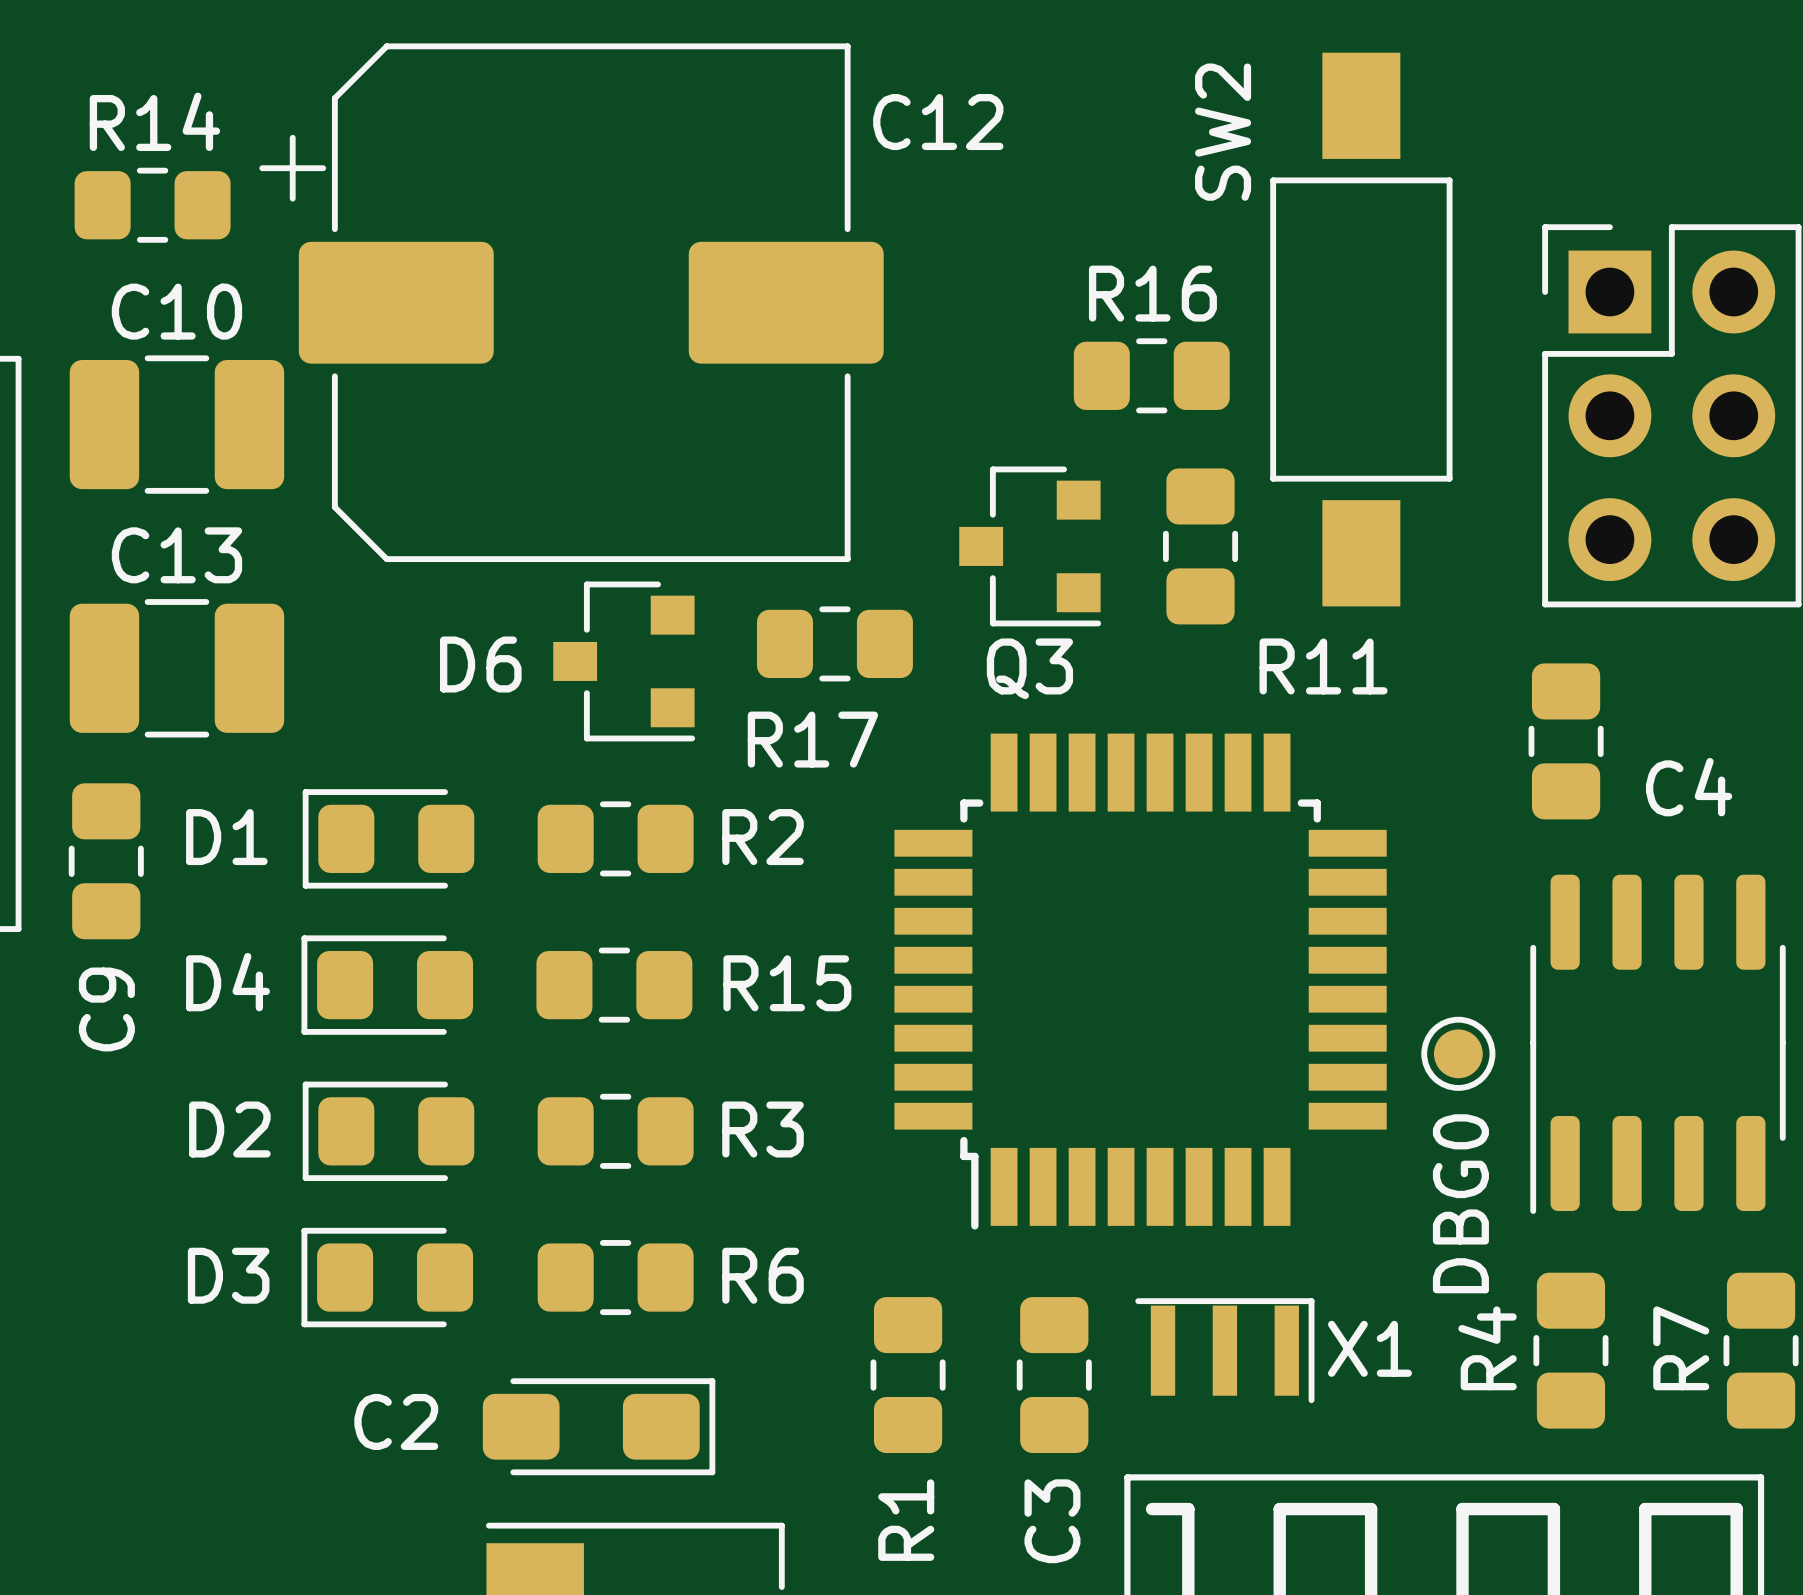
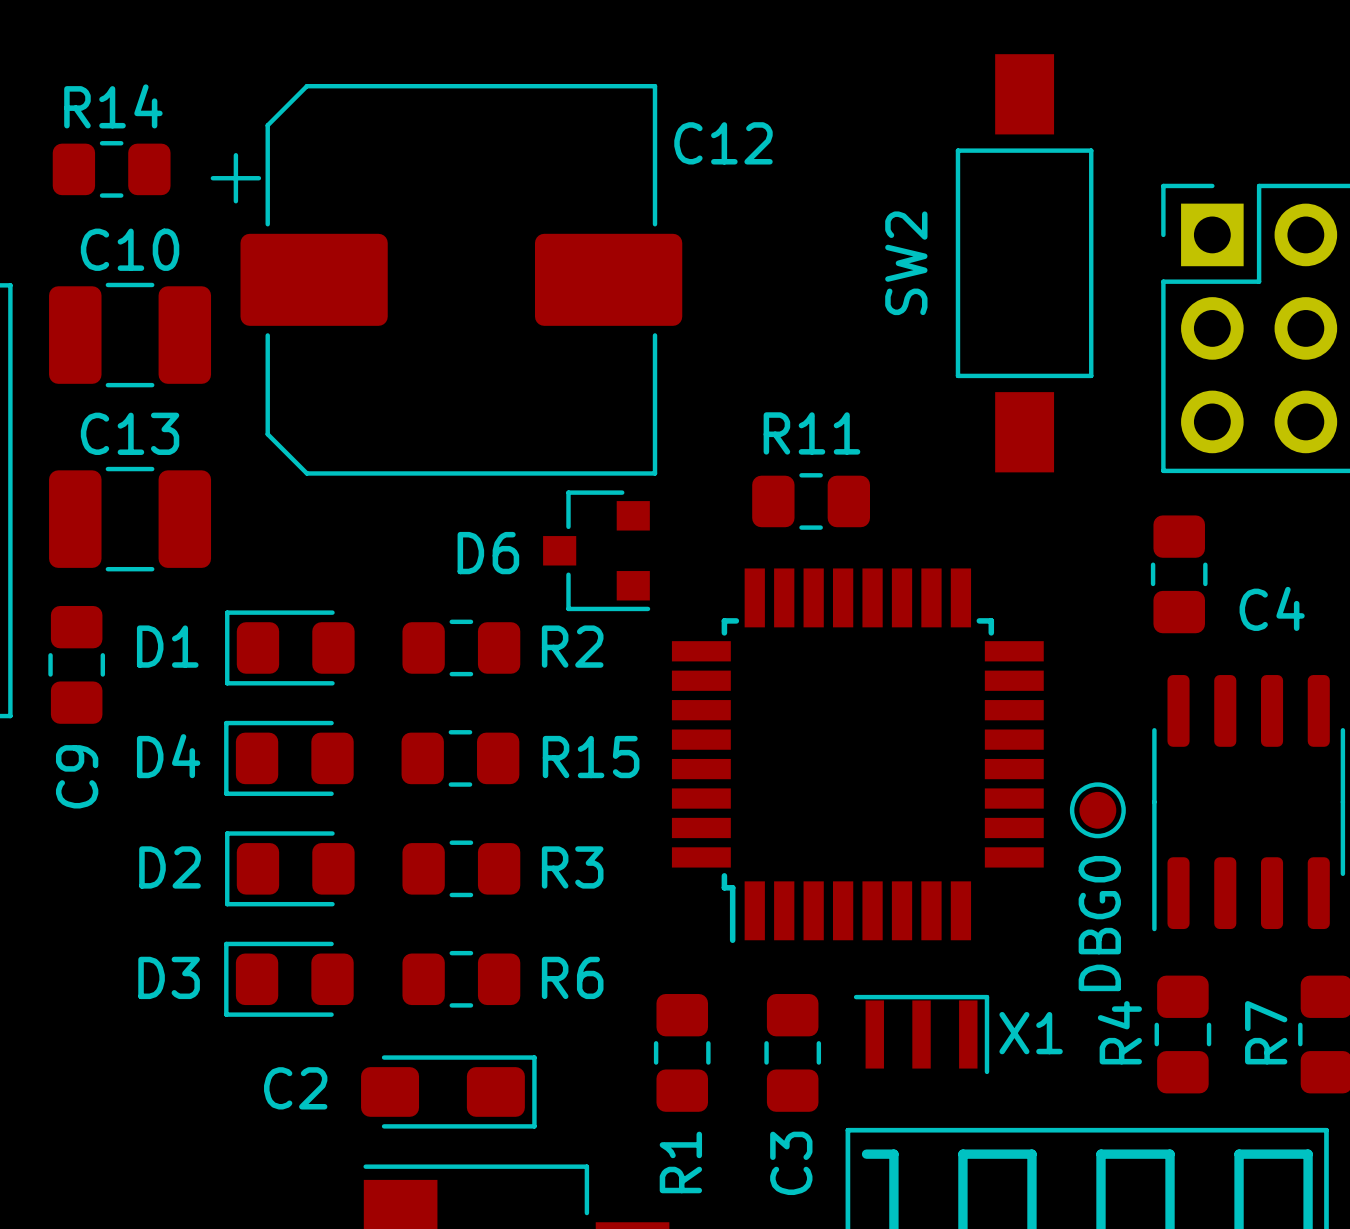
SW2 name position: SW2 (1223, 132) -> SW2 (906, 263)
C12 position: (571, 302) -> (446, 279)
R16: (1151, 375) -> none
Q3: (1030, 546) -> none
R11 rotation: 0° (1200, 546) -> 90° clockwise (811, 501)
R11 position: (1200, 546) -> (811, 501)
R17: (834, 643) -> none
D6 position: (624, 661) -> (596, 550)
R11 name position: R11 (1323, 666) -> R11 (811, 433)

